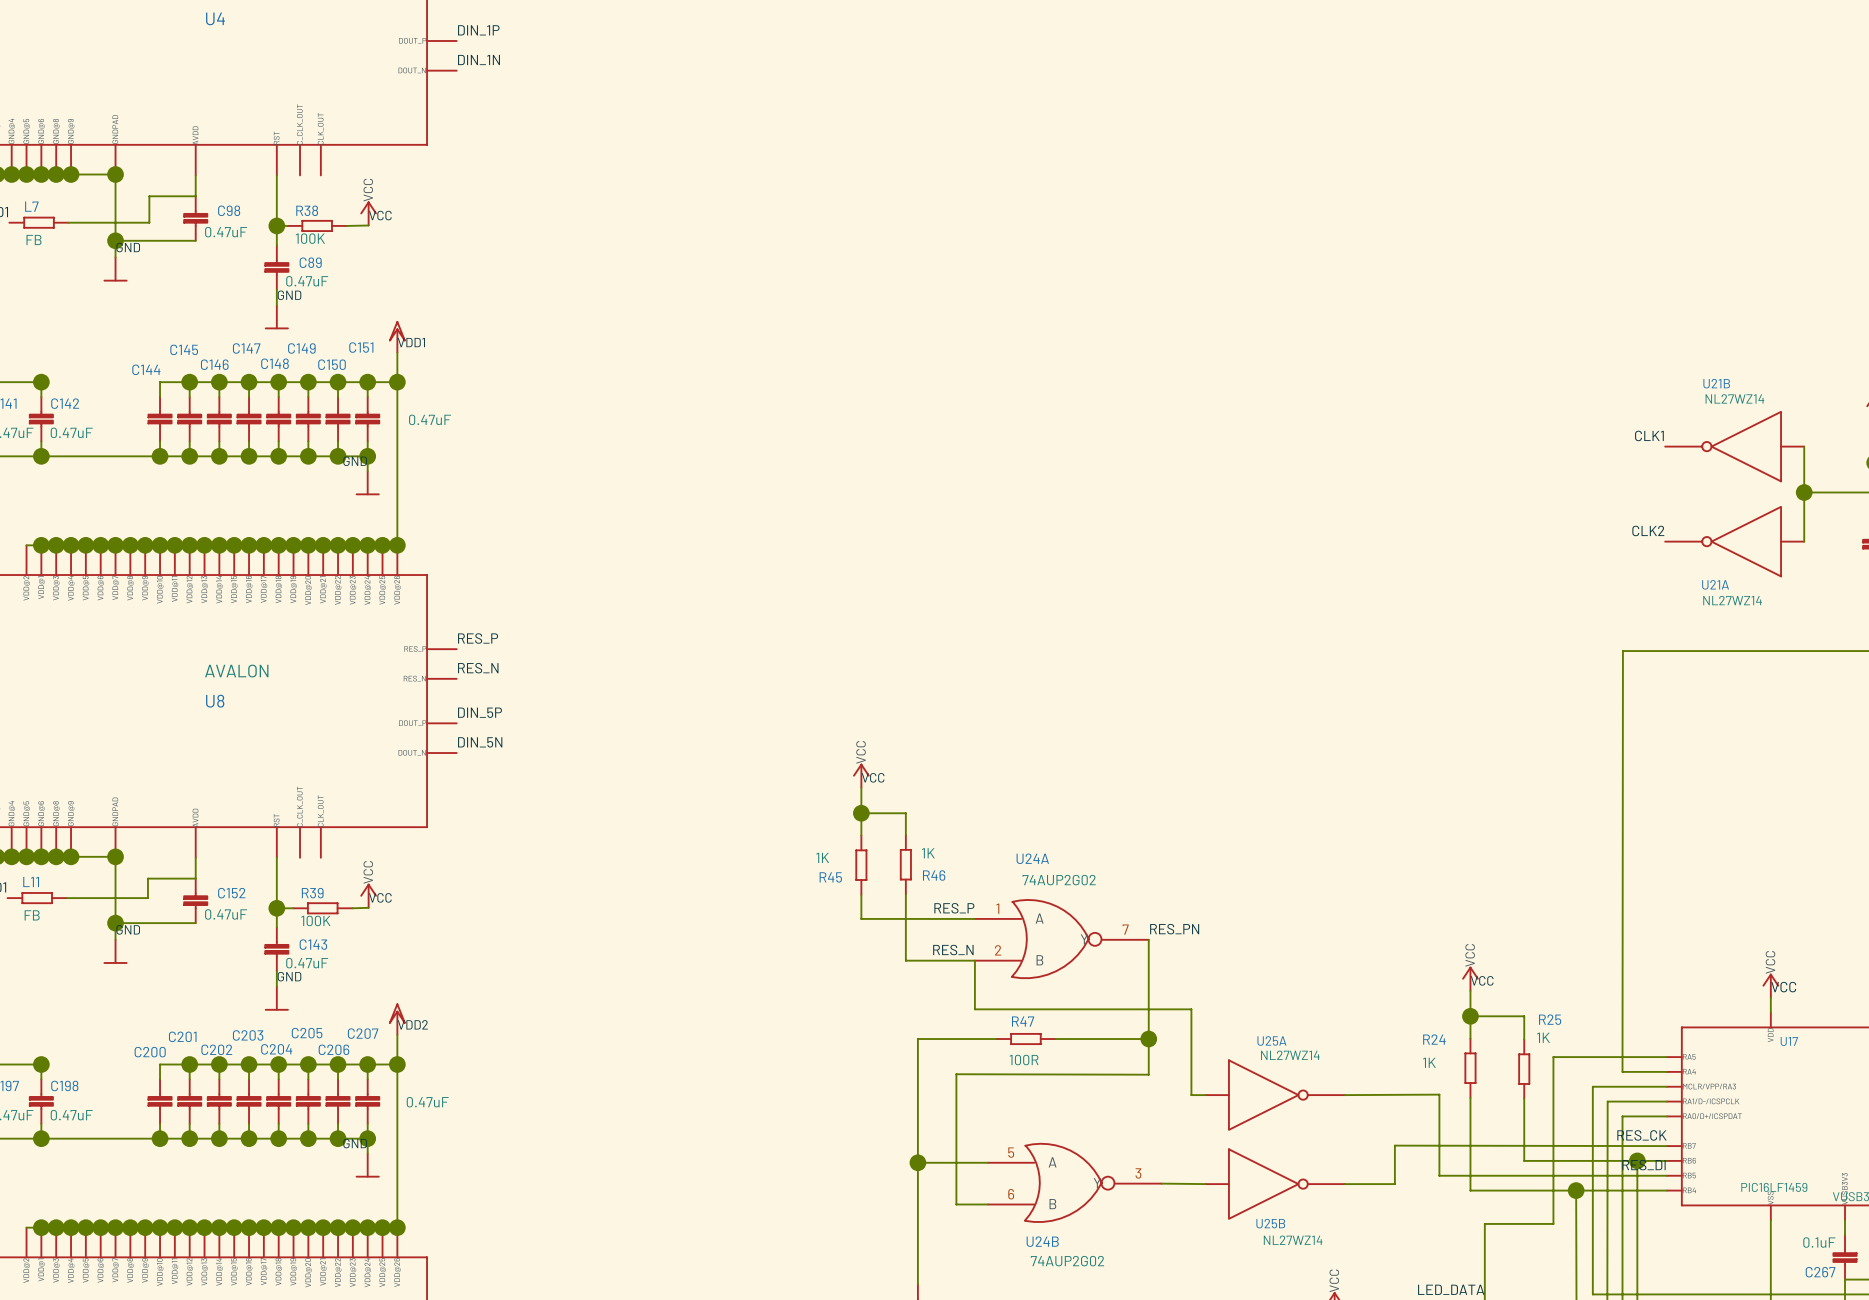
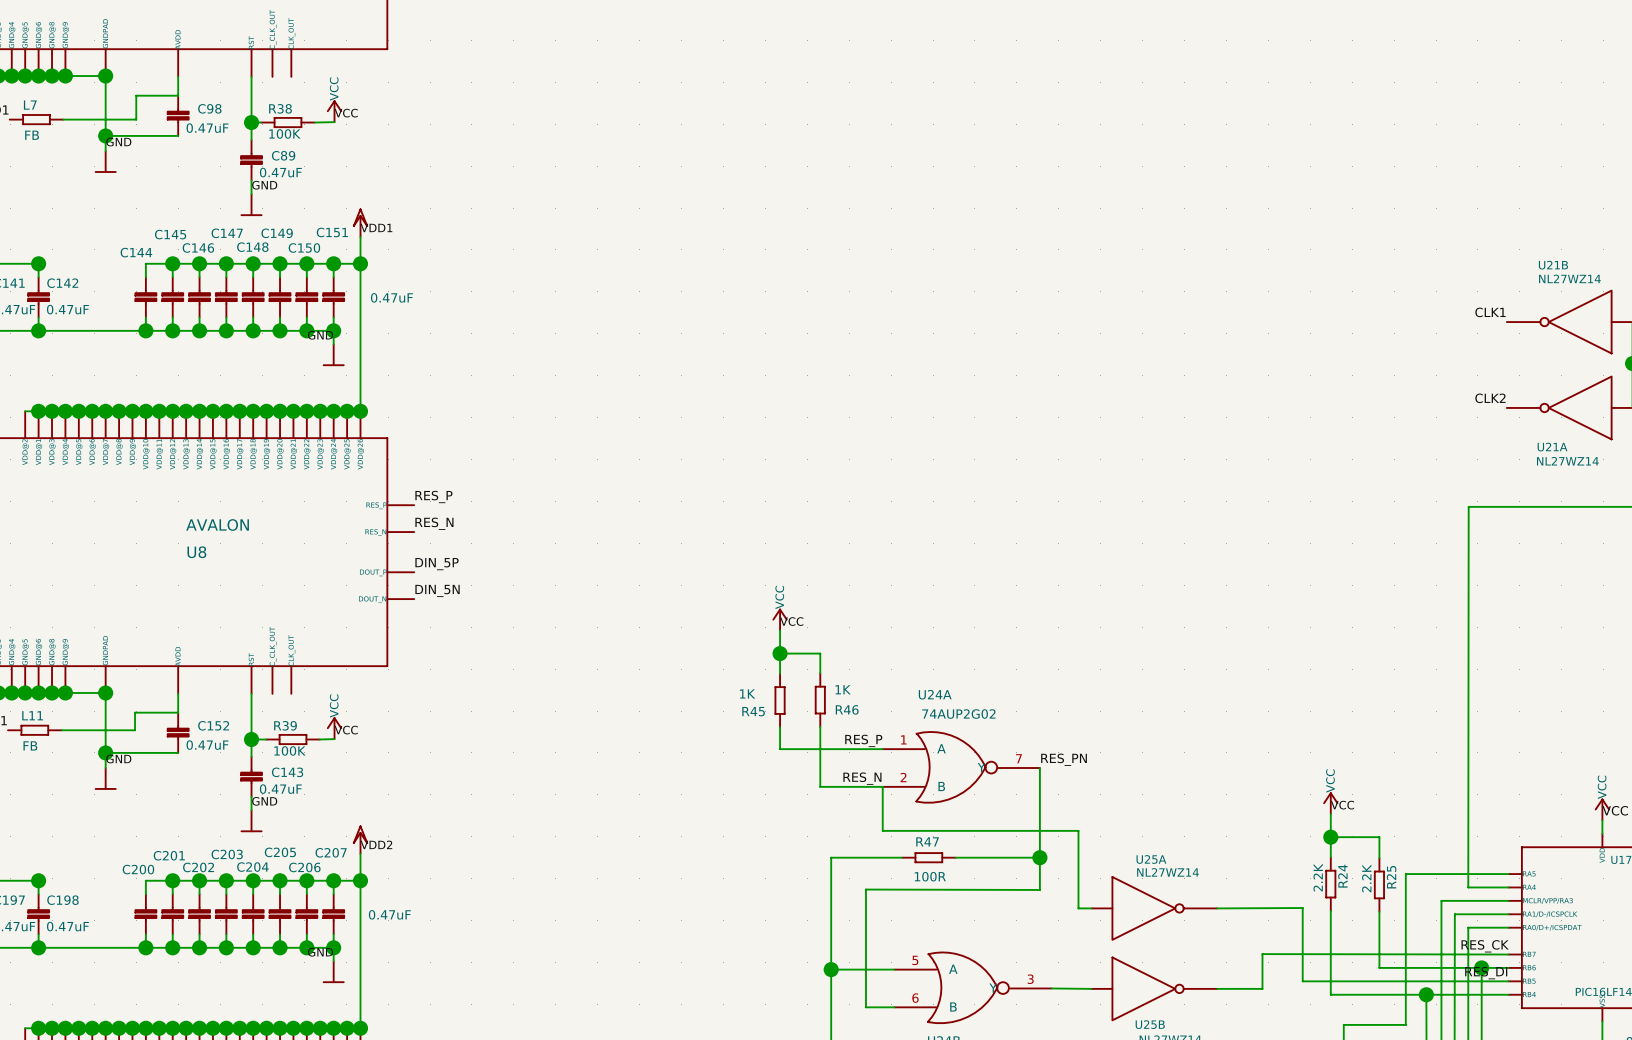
R25 name rotation: 0° (1550, 1019) -> 90° counterclockwise (1391, 877)
R25 name position: R25 (1550, 1019) -> R25 (1391, 877)
R25 value: 1K (1543, 1037) -> 2.2K (1366, 878)
R24 name rotation: 0° (1434, 1039) -> 90° counterclockwise (1342, 876)
R24 name position: R24 (1434, 1039) -> R24 (1342, 876)
R24 value: 1K (1429, 1062) -> 2.2K (1318, 877)

